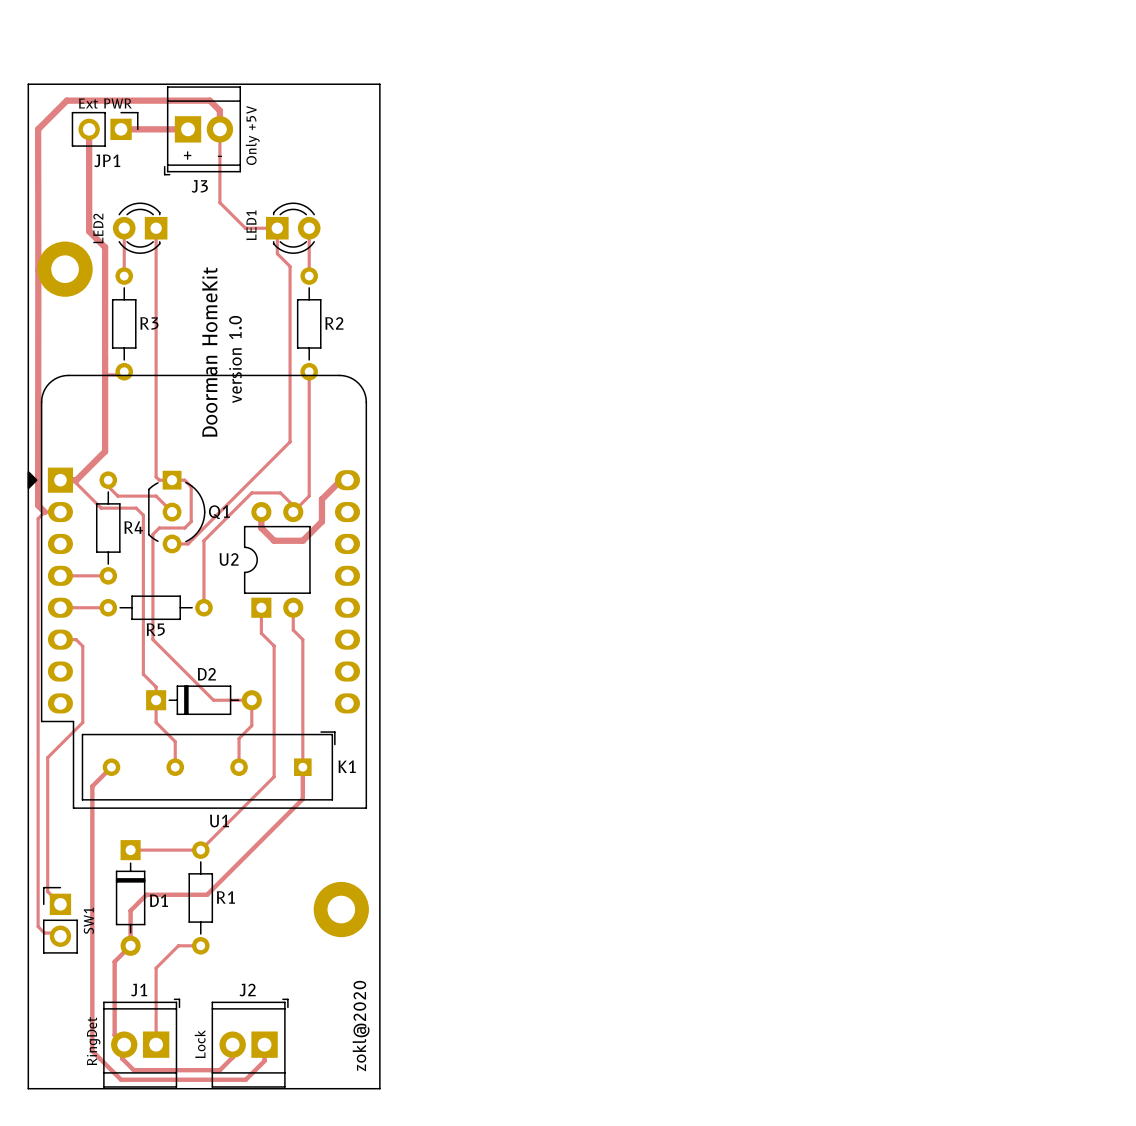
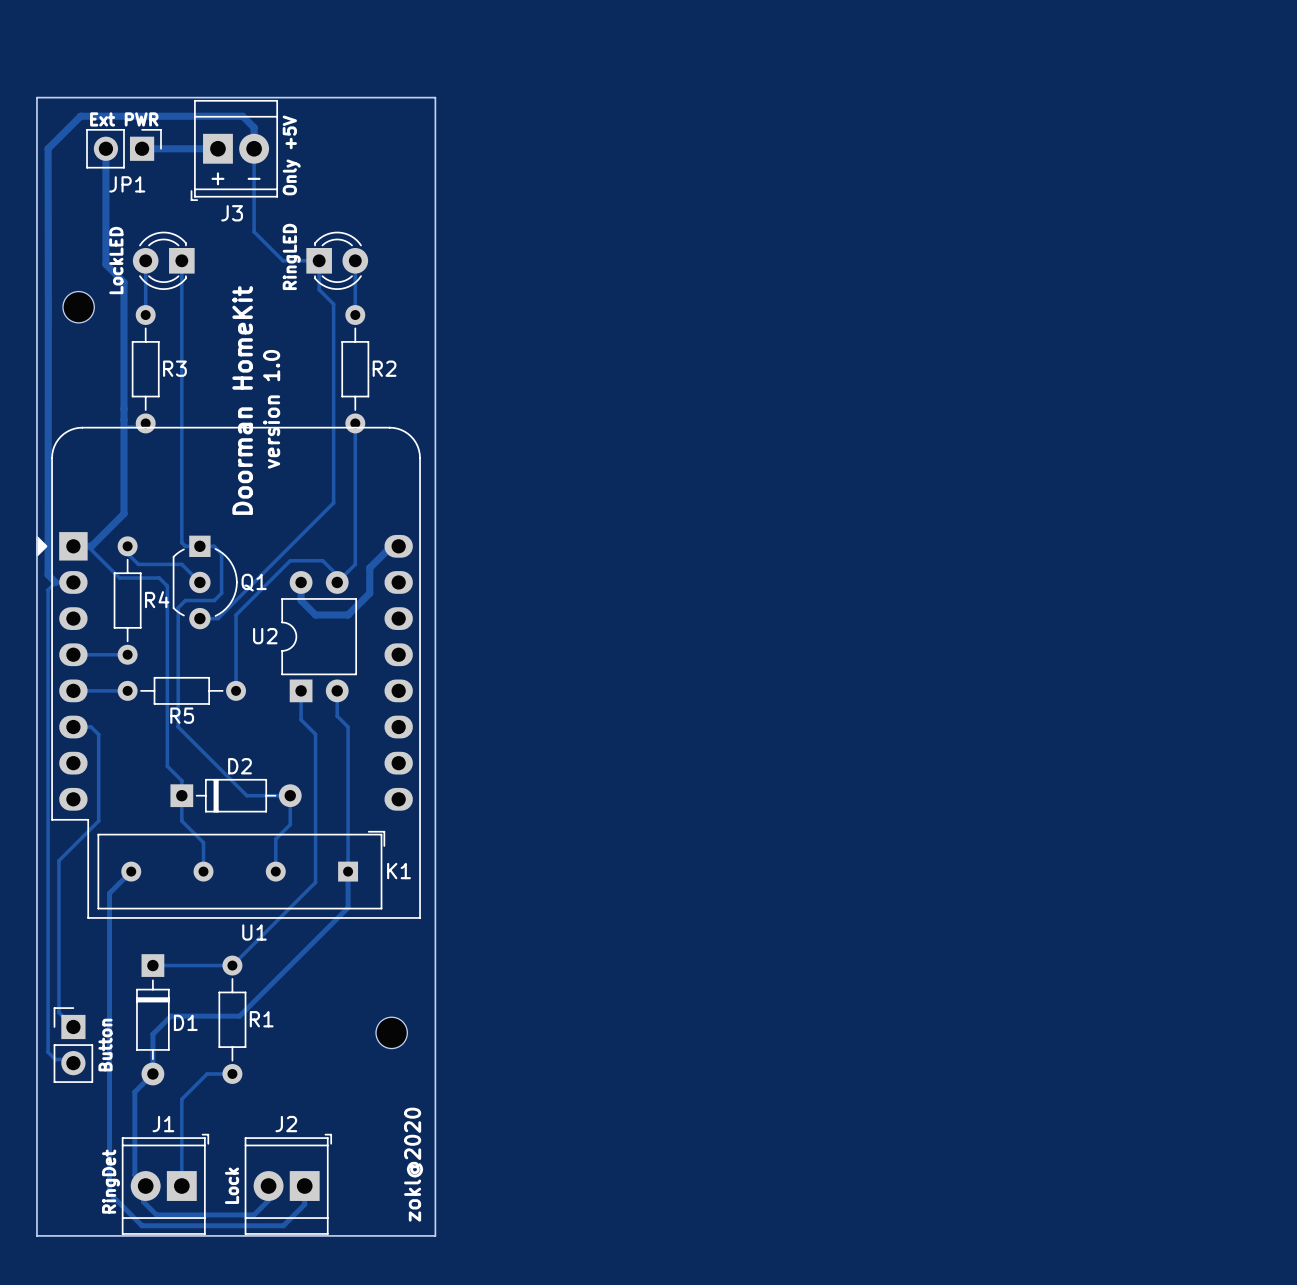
LED1 name: LED1 (251, 225) -> RingLED (291, 256)
LED2 name: LED2 (98, 228) -> LockLED (116, 260)
part footprint: [37, 241, 93, 297] -> [62, 291, 95, 323]
part footprint: [313, 881, 369, 938] -> [376, 1017, 408, 1049]
SW1 name: SW1 (88, 920) -> Button (105, 1045)

